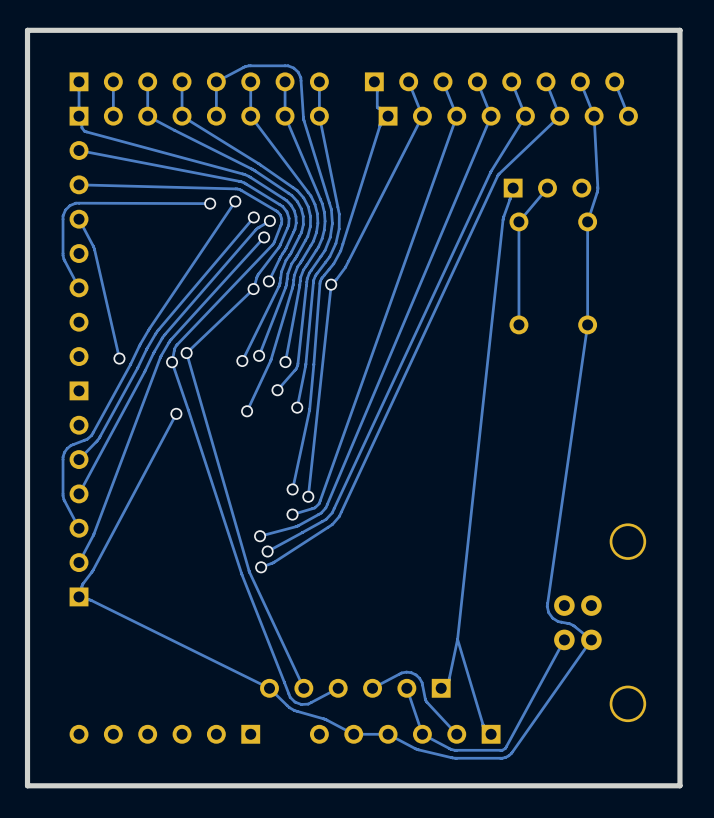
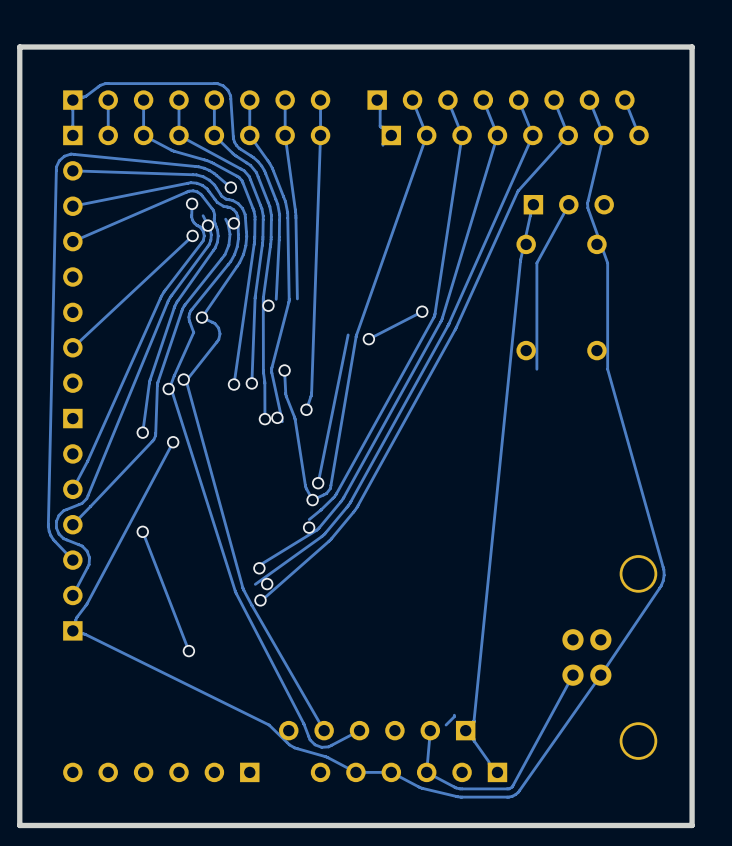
track: none -> (72, 100) (85, 96) (105, 83) (217, 83) (227, 90) (230, 95) (234, 142) (239, 148) (253, 157) (261, 166) (277, 204) (279, 237) (276, 299)
track: (216, 81) (248, 65) (288, 65) (298, 72) (300, 77) (303, 119) (331, 209) (332, 223) (330, 237) (325, 250) (307, 278) (297, 365) (277, 390) -> none
track: (79, 116) (84, 131) (244, 174) (286, 200) (294, 210) (295, 216) (294, 229) (268, 281) -> none
track: (182, 116) (258, 163) (297, 190) (308, 206) (310, 216) (307, 236) (291, 263) (285, 286) (259, 355) -> (179, 135) (244, 170) (249, 176) (261, 208) (262, 239) (255, 297) (251, 383)
track: none -> (214, 135) (256, 172) (271, 215) (270, 244) (263, 298) (264, 419)
track: (250, 116) (310, 195) (317, 213) (317, 223) (313, 241) (294, 275) (292, 288) (270, 360) (247, 411) -> (249, 135) (272, 168) (285, 201) (287, 212) (289, 299) (271, 368) (282, 421)
track: (285, 116) (322, 203) (325, 221) (322, 238) (300, 277) (285, 362) -> (285, 135) (295, 215) (297, 298)
track: (319, 116) (339, 214) (339, 228) (335, 243) (329, 256) (313, 280) (305, 364) (297, 407) -> (320, 135) (311, 393) (306, 409)
track: (422, 116) (345, 267) (331, 284) -> (426, 135) (356, 335) (330, 488) (326, 493) (312, 500) (305, 486) (295, 418) (285, 394) (284, 370)
track: (456, 116) (319, 503) (314, 507) (292, 514) -> (462, 135) (434, 316) (335, 494) (321, 509)
track: (491, 116) (325, 507) (321, 513) (297, 525) (260, 536) -> (497, 135) (441, 320) (343, 498) (316, 530) (255, 567)
track: (525, 116) (490, 172) (332, 512) (326, 519) (302, 532) -> (532, 135) (448, 324) (350, 502) (322, 535) (255, 584)
track: (559, 116) (498, 175) (339, 516) (332, 524) (273, 562) (261, 567) -> (568, 135) (517, 191) (455, 329) (357, 507) (329, 540) (263, 599)
track: (594, 116) (597, 188) (587, 221) (587, 324) (547, 606) (552, 618) (573, 625) (591, 639) -> (603, 135) (587, 203) (607, 263) (607, 369) (664, 575) (661, 585) (600, 675)
track: (379, 126) (340, 250) (320, 281) (309, 409) (292, 489) -> none
track: (174, 130) (254, 170) (291, 195) (301, 208) (303, 216) (301, 232) (285, 260) (279, 285) (242, 361) -> (171, 150) (206, 160) (239, 177) (254, 211) (254, 242) (234, 384)
track: (79, 150) (241, 181) (282, 206) (286, 211) (288, 225) (280, 244) (258, 274) (253, 289) (186, 353) (249, 571) (303, 688) -> (72, 170) (196, 174) (209, 180) (221, 196) (238, 203) (242, 208) (245, 214) (246, 236) (243, 254) (202, 317) (214, 323) (218, 328) (218, 339) (186, 380) (243, 589) (324, 730)
track: none -> (230, 187) (214, 173) (198, 166) (71, 154) (59, 160) (56, 167) (48, 526) (53, 539) (72, 560)
via: none -> (230, 187)
track: none -> (192, 203) (192, 220) (197, 225)
via: none -> (192, 203)
track: none -> (533, 204) (520, 260) (474, 722) (465, 730) (474, 740)
track: none -> (568, 204) (536, 263) (536, 369)
track: (79, 184) (237, 188) (280, 215) (281, 223) (273, 244) (174, 348) (172, 362) (188, 409) -> (72, 206) (190, 182) (202, 185) (217, 202) (230, 207) (236, 212) (238, 238) (234, 254) (190, 310) (189, 320) (193, 332) (170, 386) (235, 591) (303, 723) (310, 739) (315, 744) (328, 746) (359, 730)
track: (513, 188) (503, 219) (457, 639) -> none
track: (547, 188) (518, 221) (518, 324) -> none
part position: (547, 188) -> (568, 204)
track: (235, 201) (148, 330) (91, 435) (70, 445) (64, 452) (63, 490) -> (203, 215) (210, 229) (209, 244) (168, 301) (86, 498) (82, 503) (63, 510) (56, 521)
track: (210, 203) (75, 203) (69, 205) (63, 215) (63, 255) (79, 287) -> none
track: none -> (192, 235) (72, 347)
via: none -> (192, 235)
track: (253, 217) (157, 330) (99, 438) (79, 459) -> (197, 225) (203, 230) (203, 240) (161, 296) (87, 460) (72, 489)
via: (253, 217) -> none
track: (79, 219) (94, 248) (119, 358) -> (72, 241) (188, 191) (200, 194) (213, 210) (217, 229) (217, 242) (174, 306) (149, 380) (142, 432)
track: (269, 220) (256, 229) (162, 337) (79, 493) -> (225, 219) (230, 234) (228, 244) (224, 254) (182, 309) (158, 381) (155, 435) (153, 439) (72, 524)
via: (269, 220) -> none
track: (264, 237) (170, 339) (161, 355) (93, 535) -> none
via: (264, 237) -> none
track: (331, 284) (308, 496) -> none
via: (331, 284) -> none
track: none -> (422, 311) (368, 339)
via: none -> (422, 311)
via: (253, 289) -> none
via: none -> (202, 317)
track: none -> (348, 334) (318, 483)
via: none -> (368, 339)
via: none -> (284, 370)
via: (259, 355) -> none
via: none -> (251, 383)
via: none -> (234, 384)
via: (119, 358) -> none
via: (242, 361) -> none
via: (285, 362) -> none
via: none -> (306, 409)
via: none -> (264, 419)
via: none -> (142, 432)
via: (297, 407) -> none
track: (188, 409) (241, 573) (284, 682) -> none
via: (247, 411) -> none
via: none -> (318, 483)
via: none -> (312, 500)
track: none -> (320, 510) (309, 519)
via: (292, 489) -> none
track: (63, 495) (79, 528) -> (56, 526) (59, 534) (63, 538) (82, 546) (87, 551) (89, 557) (87, 567)
track: none -> (142, 531) (188, 651)
via: none -> (142, 531)
via: (292, 514) -> none
track: (302, 532) (267, 551) -> none
via: none -> (188, 651)
track: (457, 639) (482, 724) -> (474, 741) (488, 761)
track: (457, 639) (449, 678) -> none
track: (284, 682) (290, 697) (301, 704) (308, 704) (338, 688) -> none
part position: (355, 688) -> (377, 730)
track: (372, 688) (401, 672) (406, 672) (416, 674) (422, 682) (426, 701) (456, 734) -> none
track: (406, 688) (422, 734) -> (430, 730) (426, 772)

